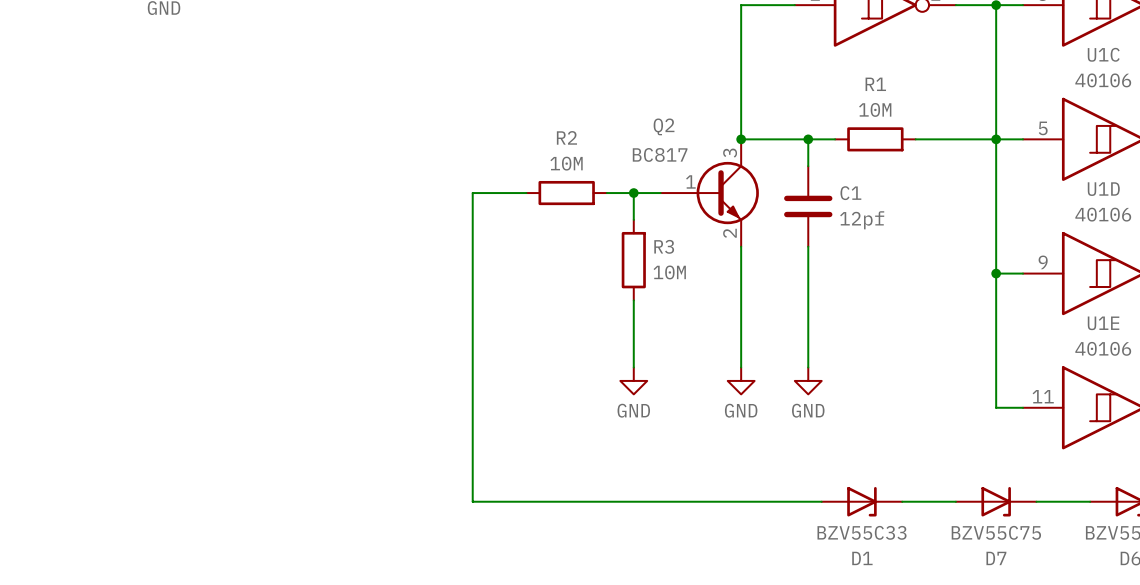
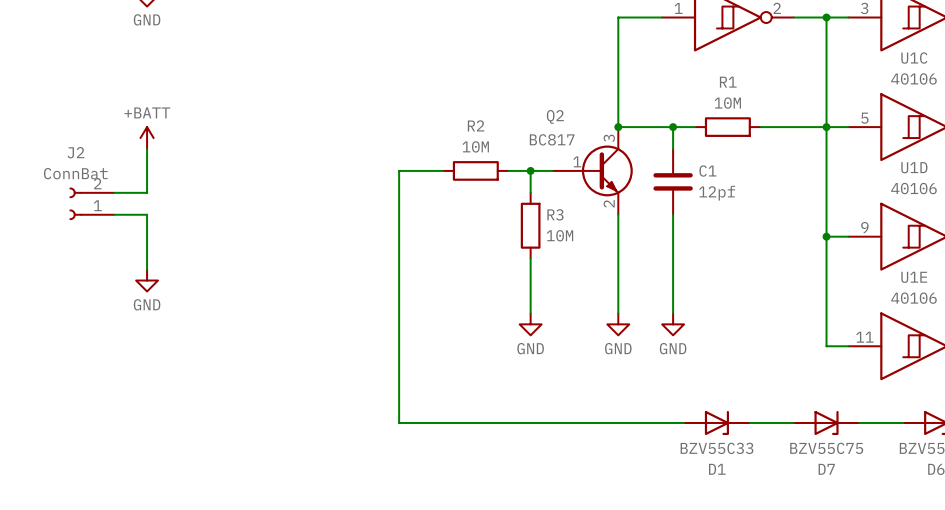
power symbol: none -> +BATT (147, 138)
wire: none -> (147, 149) (147, 192) (114, 192)
J2: none -> ConnBat (91, 203)
wire: none -> (114, 214) (147, 214) (147, 269)
power symbol: none -> GND (147, 280)

